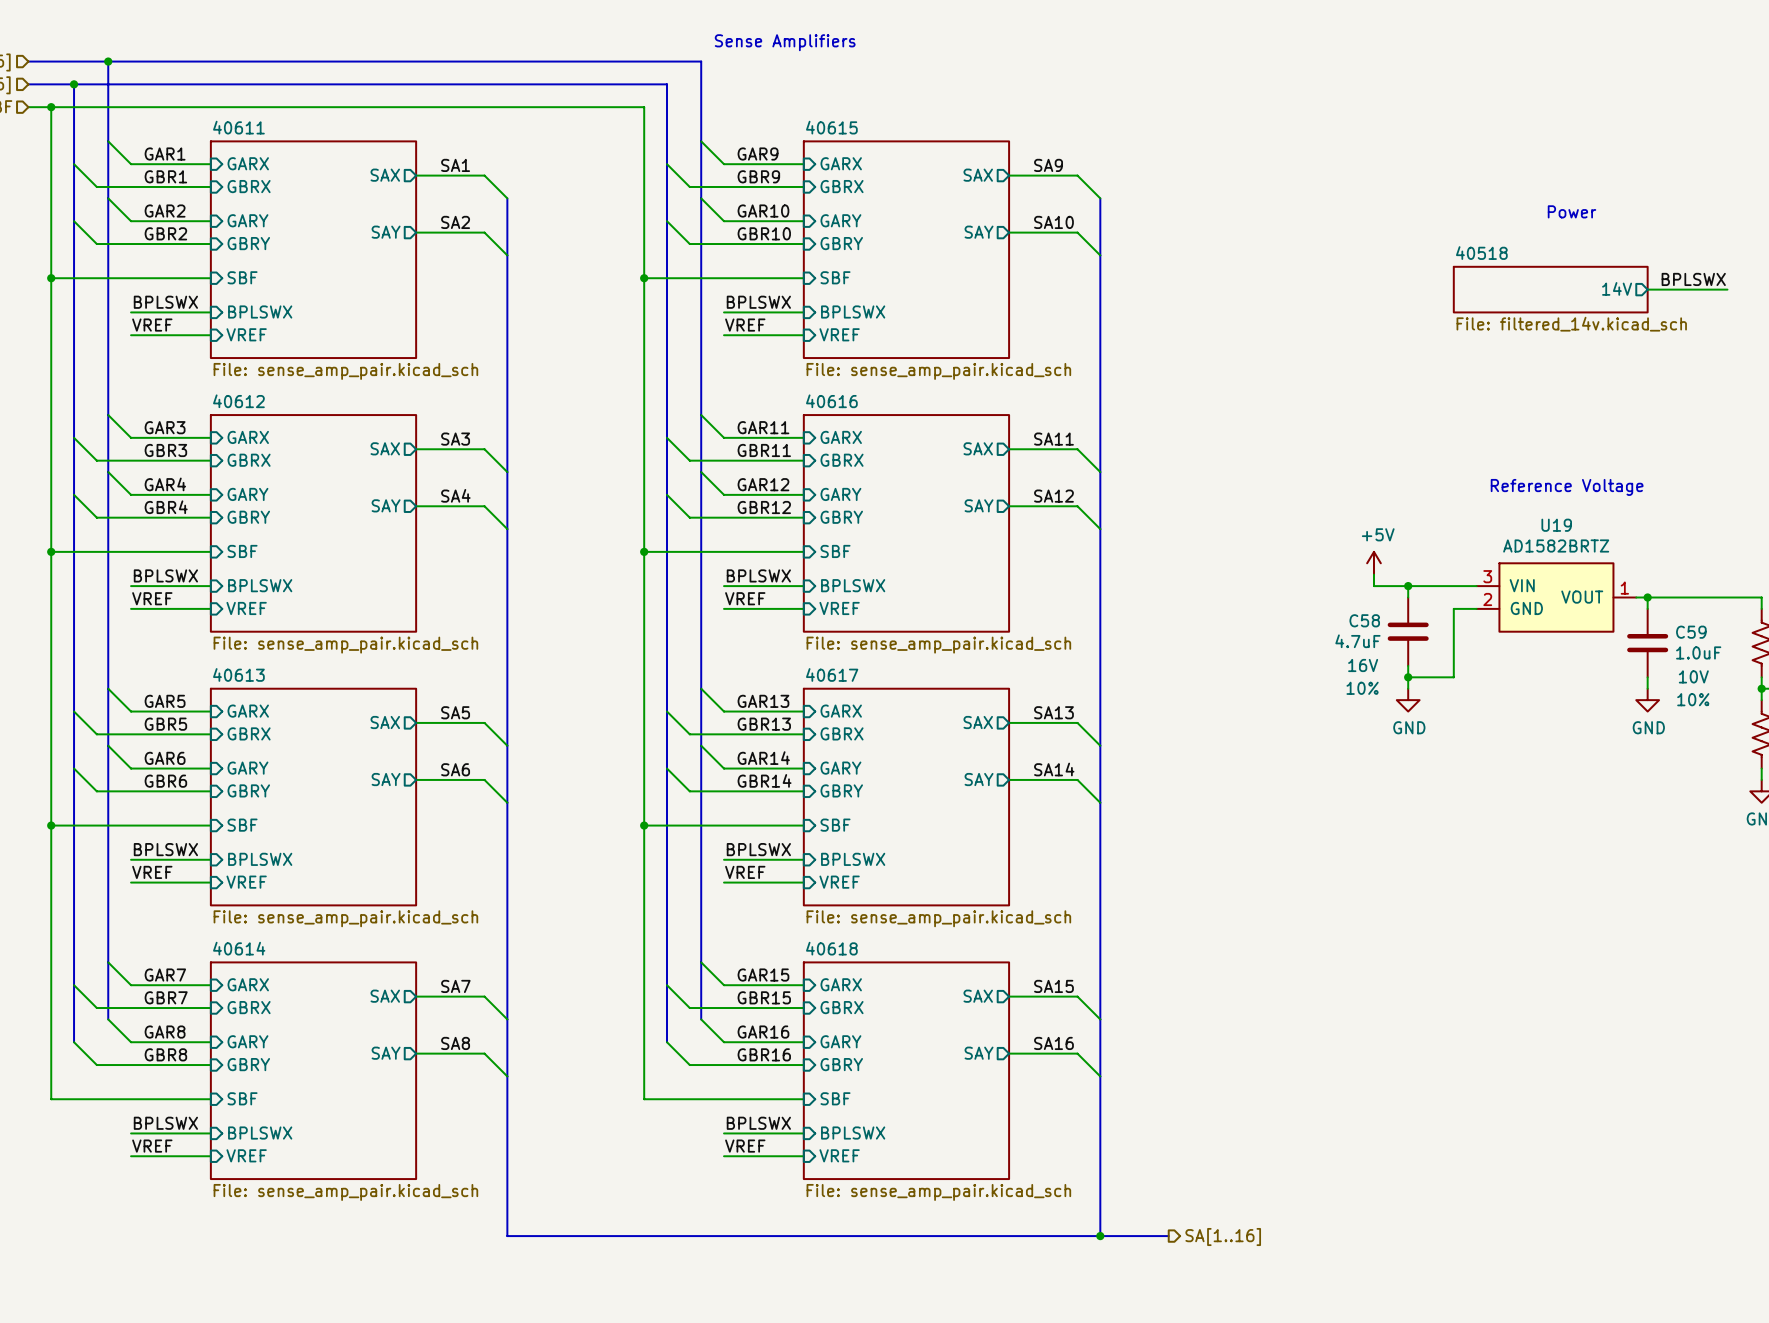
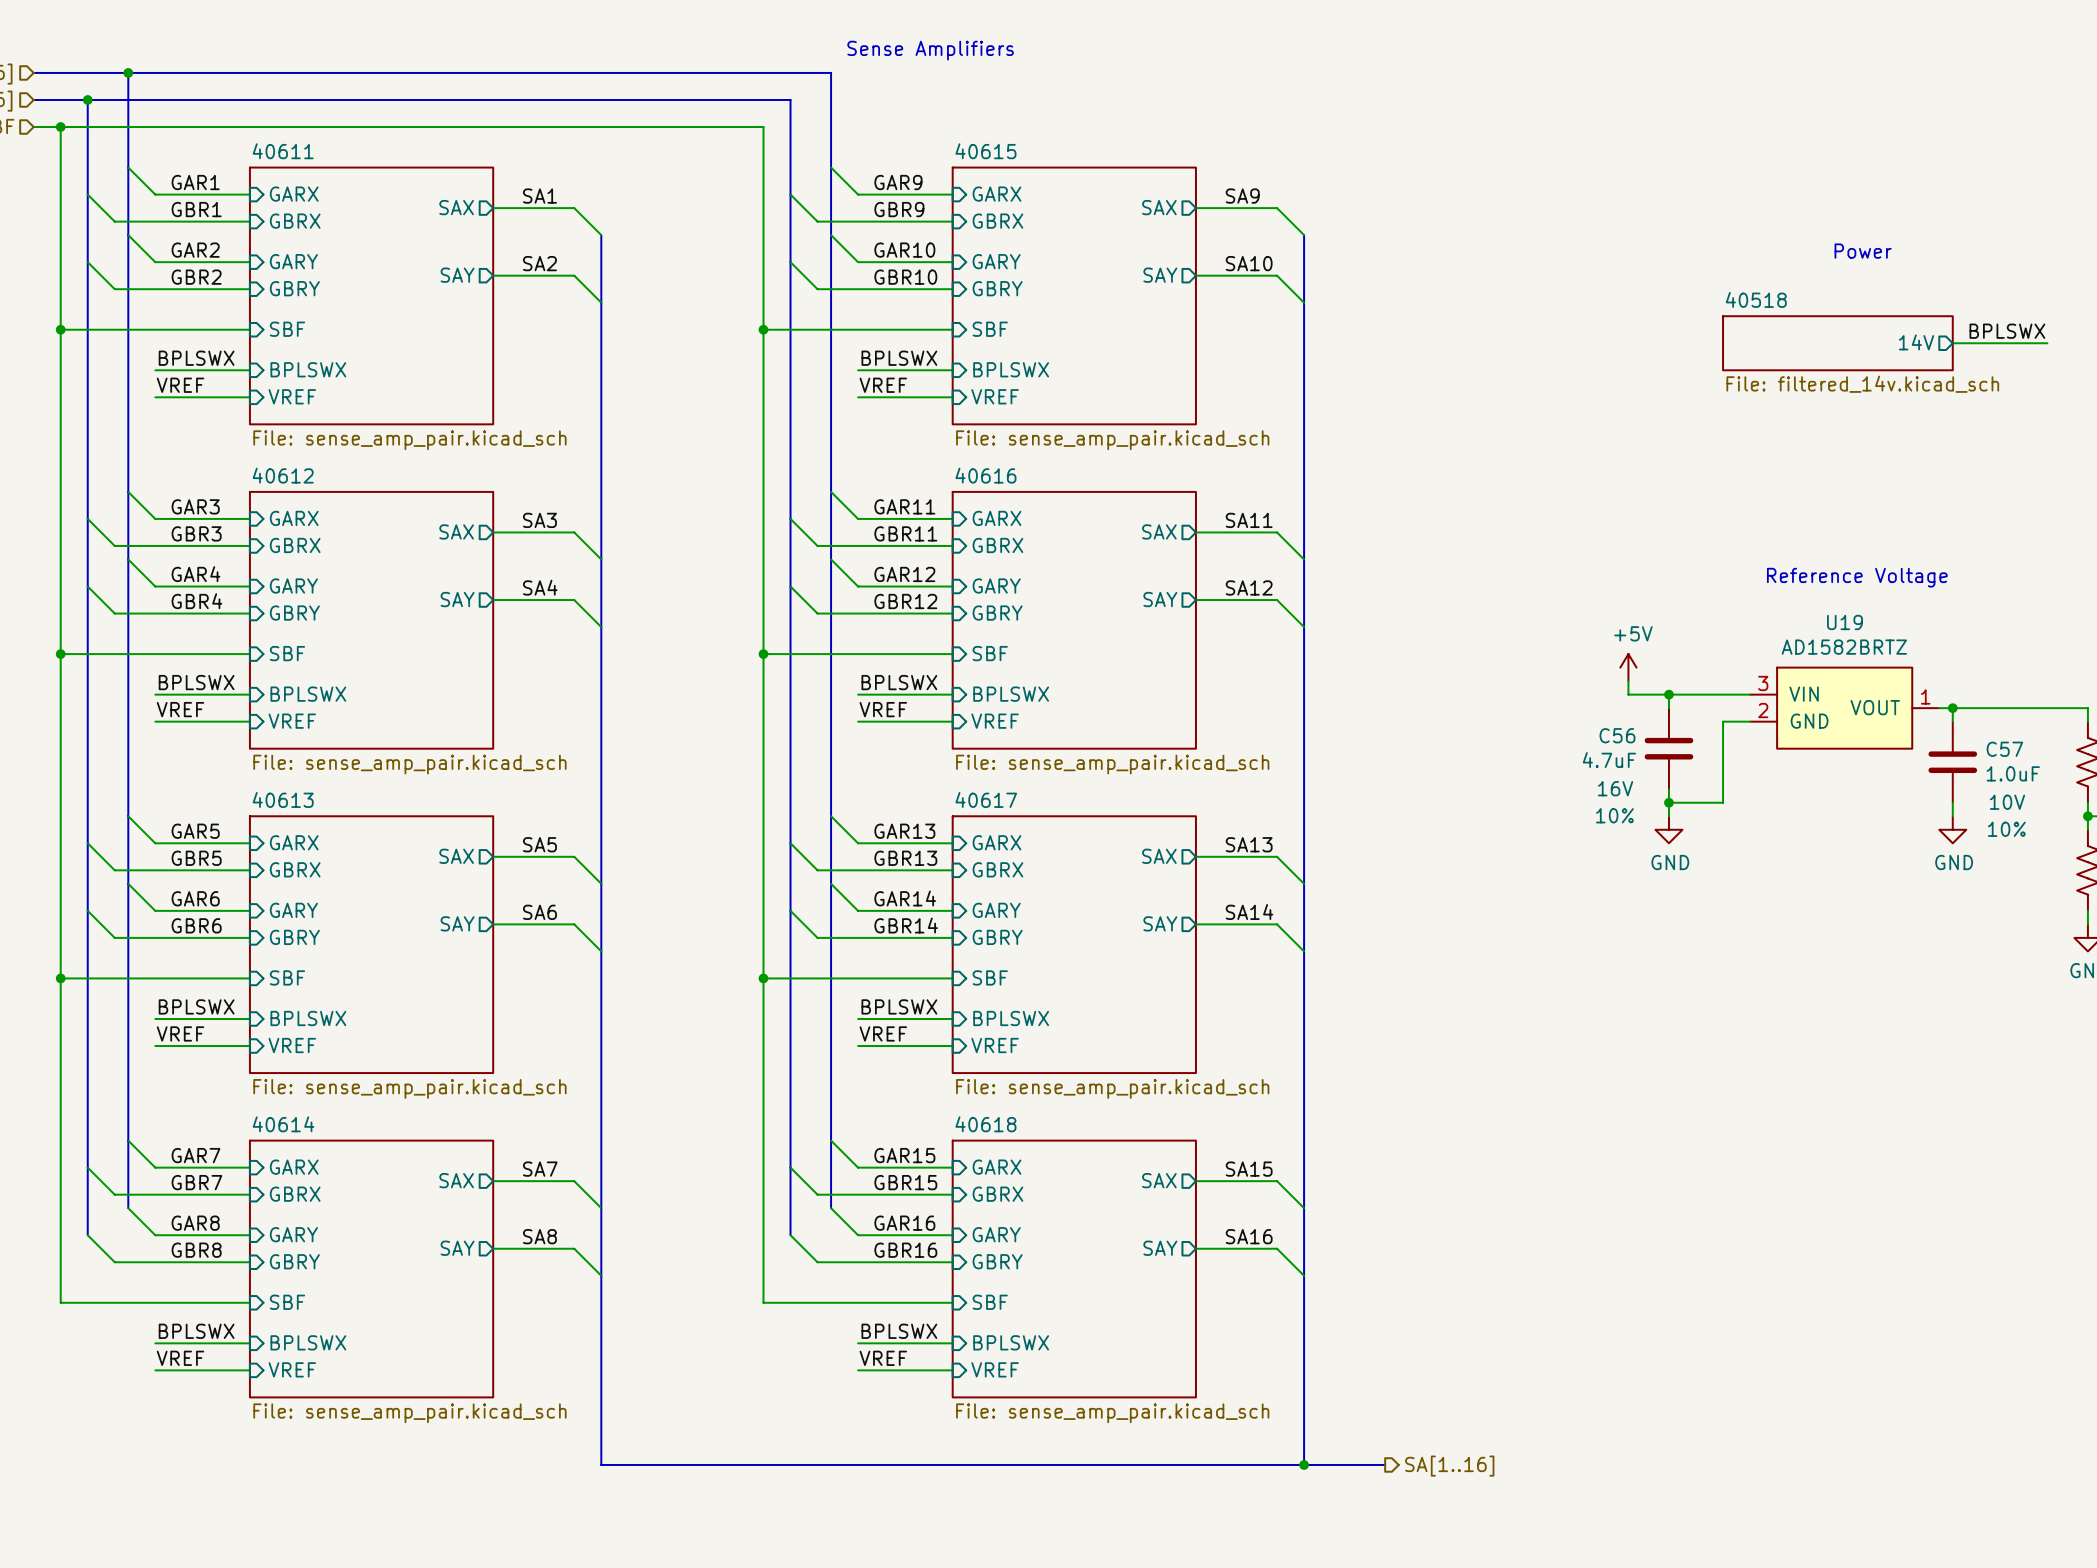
C58 name: C58 (1364, 620) -> C56 (1617, 735)
C59 name: C59 (1691, 632) -> C57 (2004, 749)

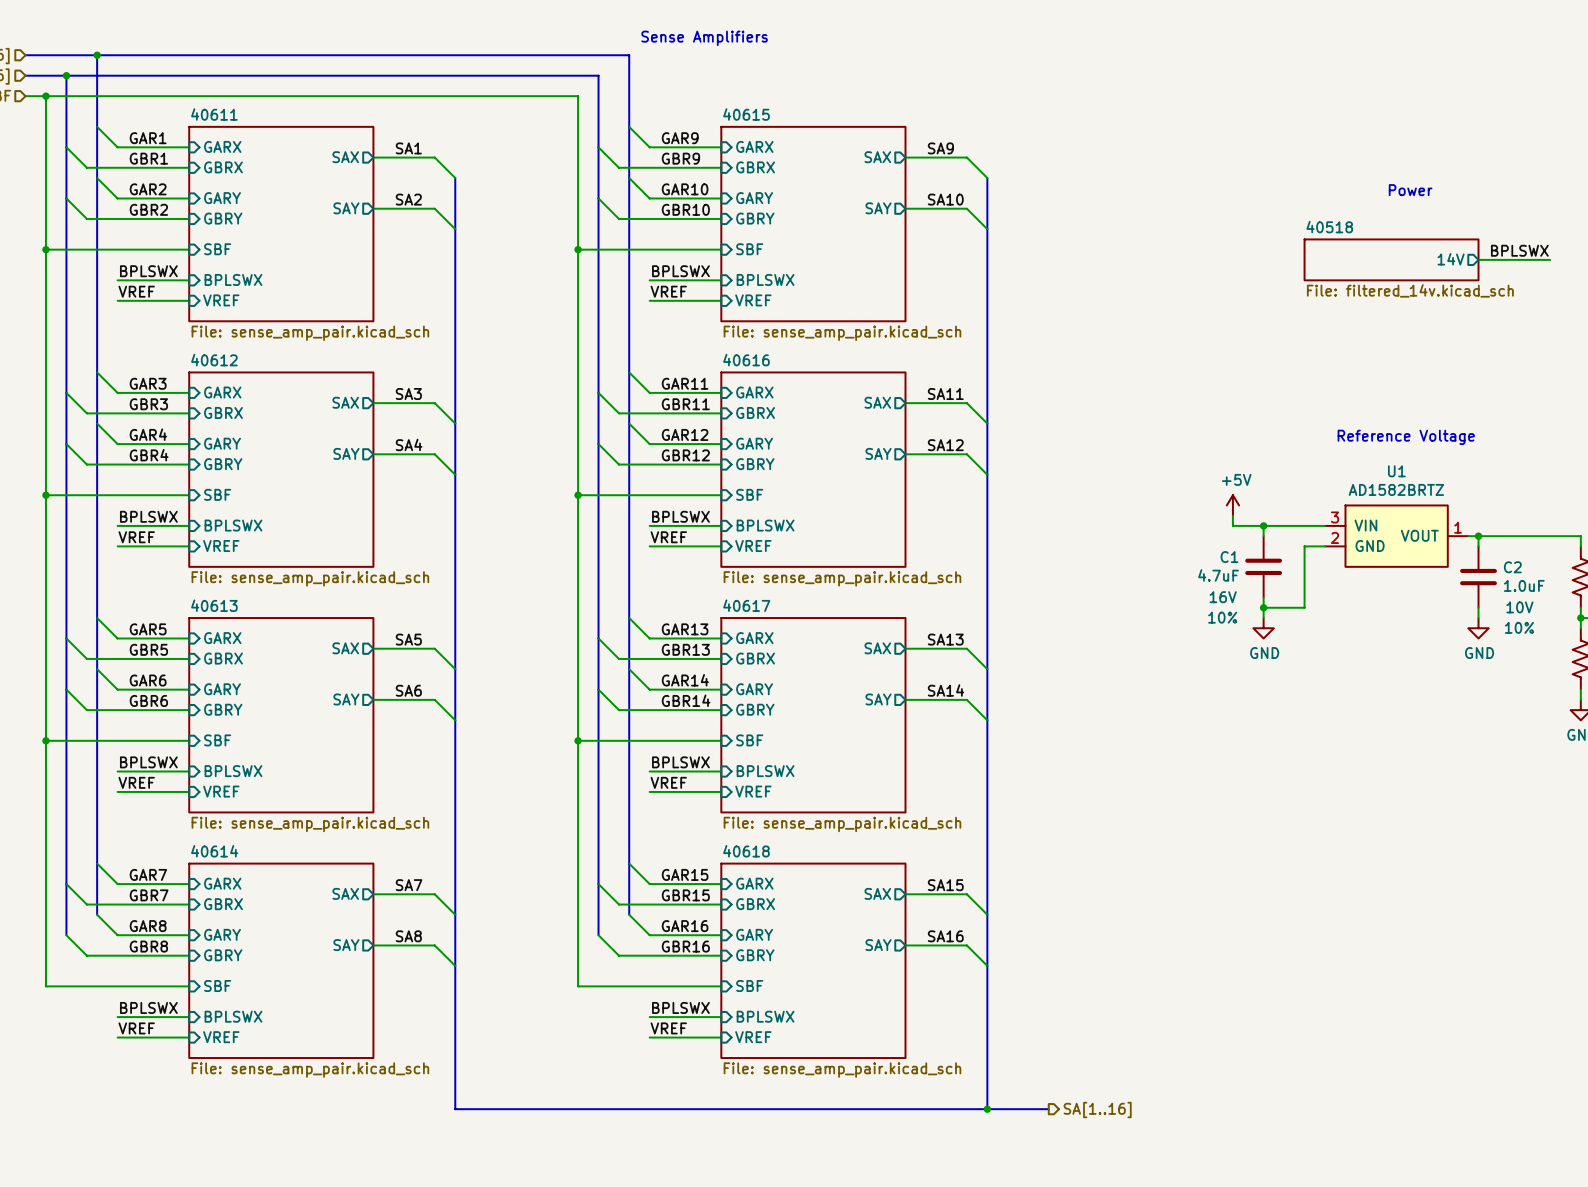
U19 name: U19 (1844, 622) -> U1 (1396, 471)
C56 name: C56 (1617, 735) -> C1 (1229, 557)
C57 name: C57 (2004, 749) -> C2 (1512, 567)

